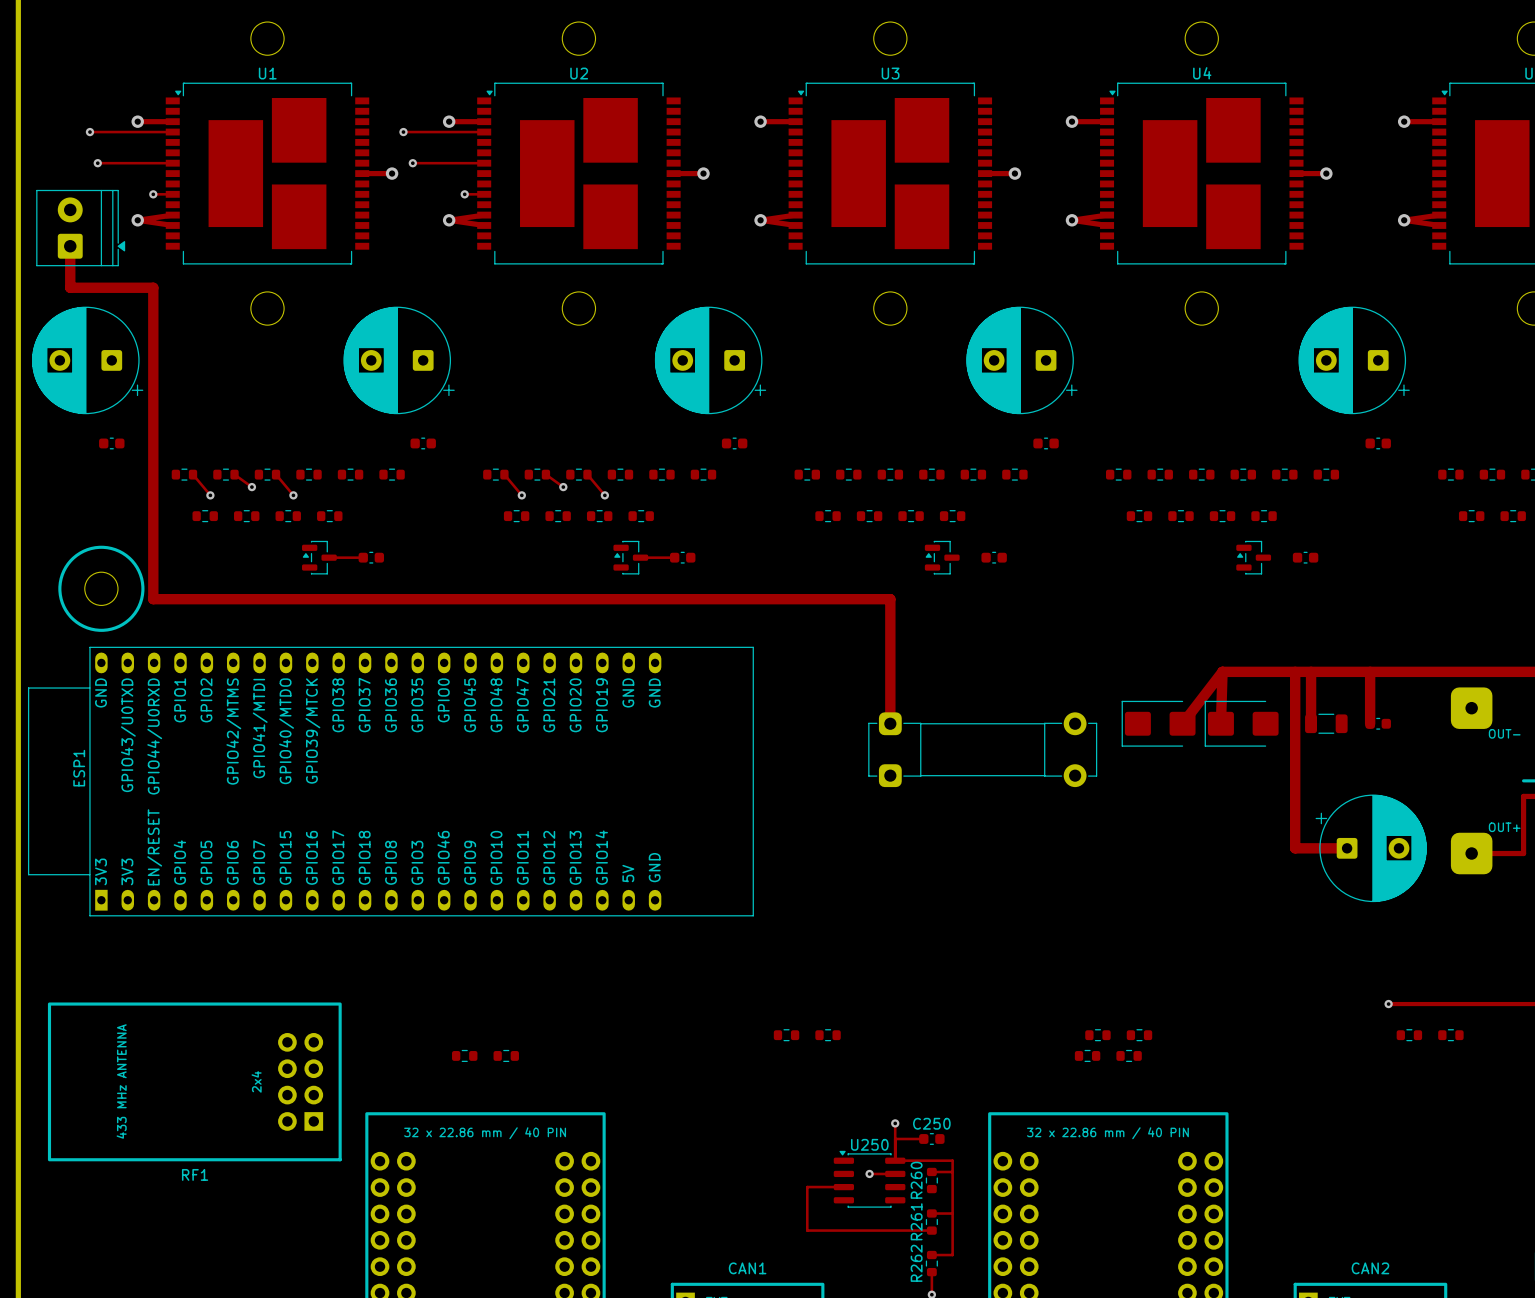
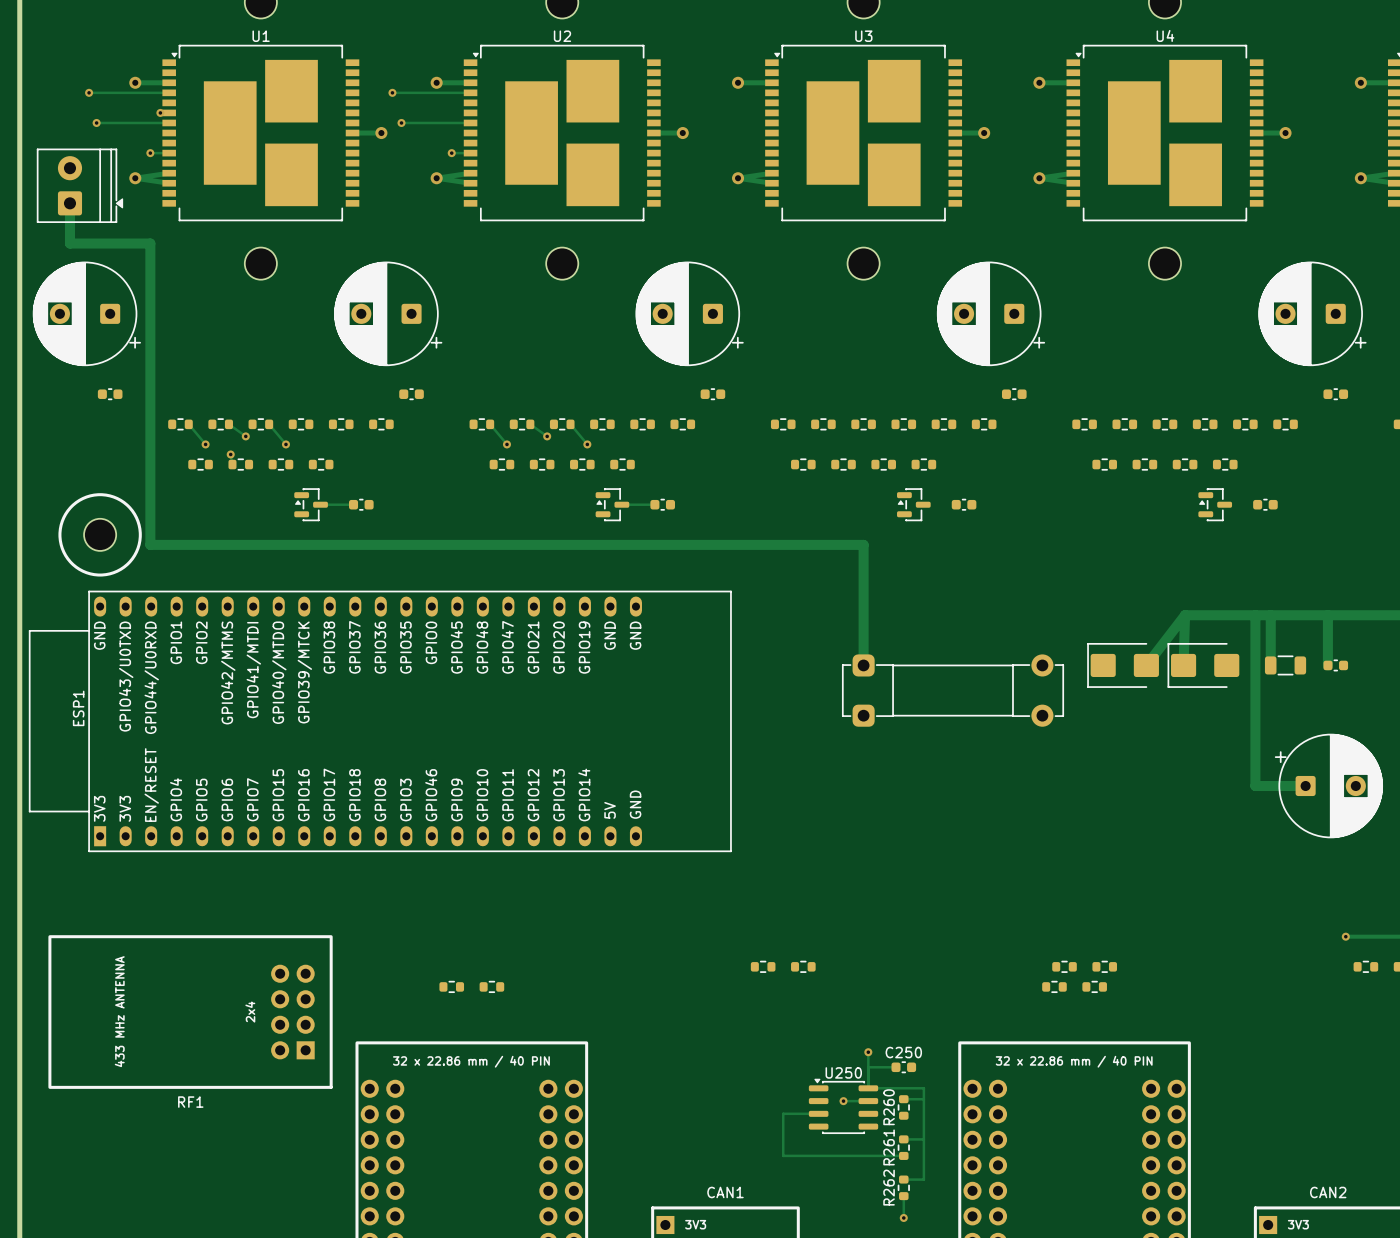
via: none -> (160, 112)
via: none -> (230, 454)

